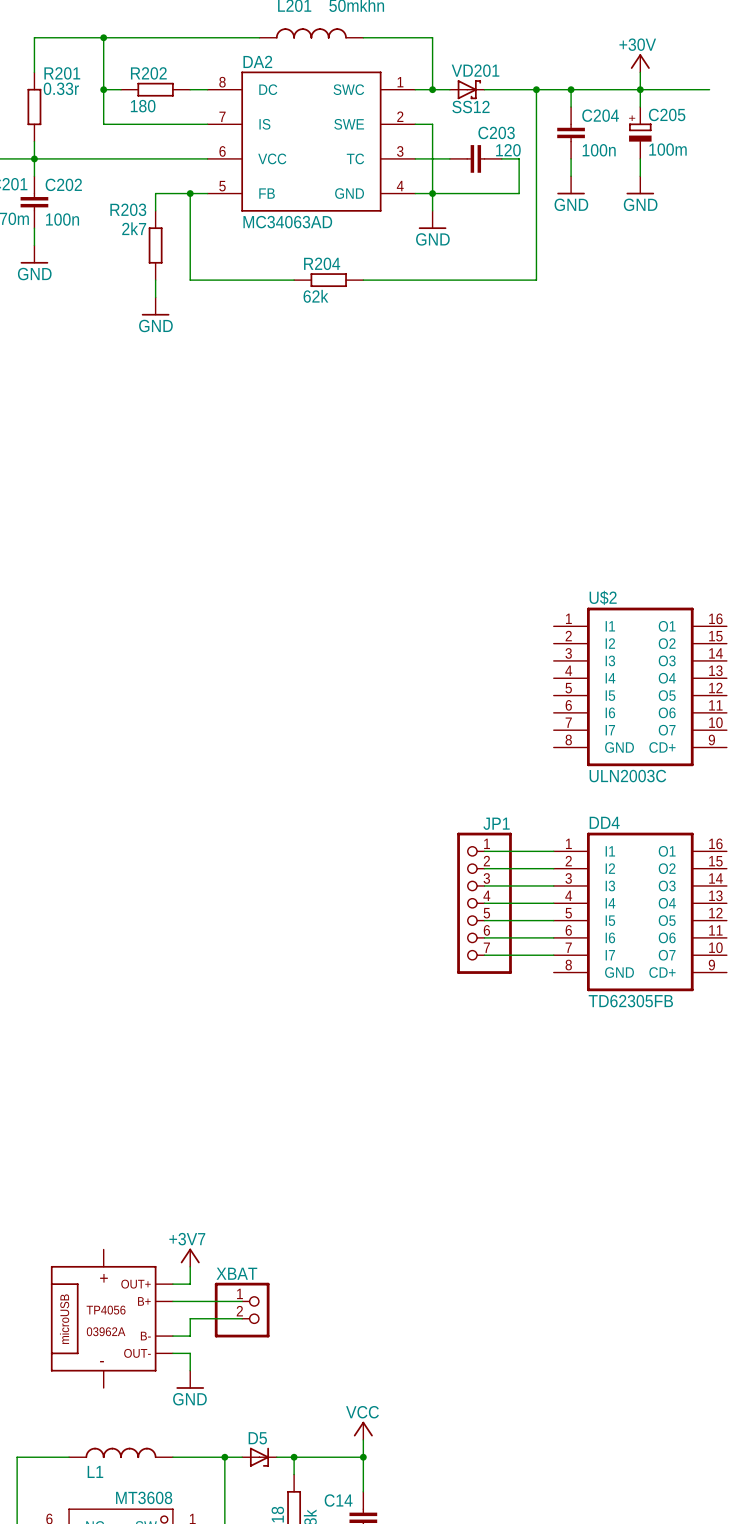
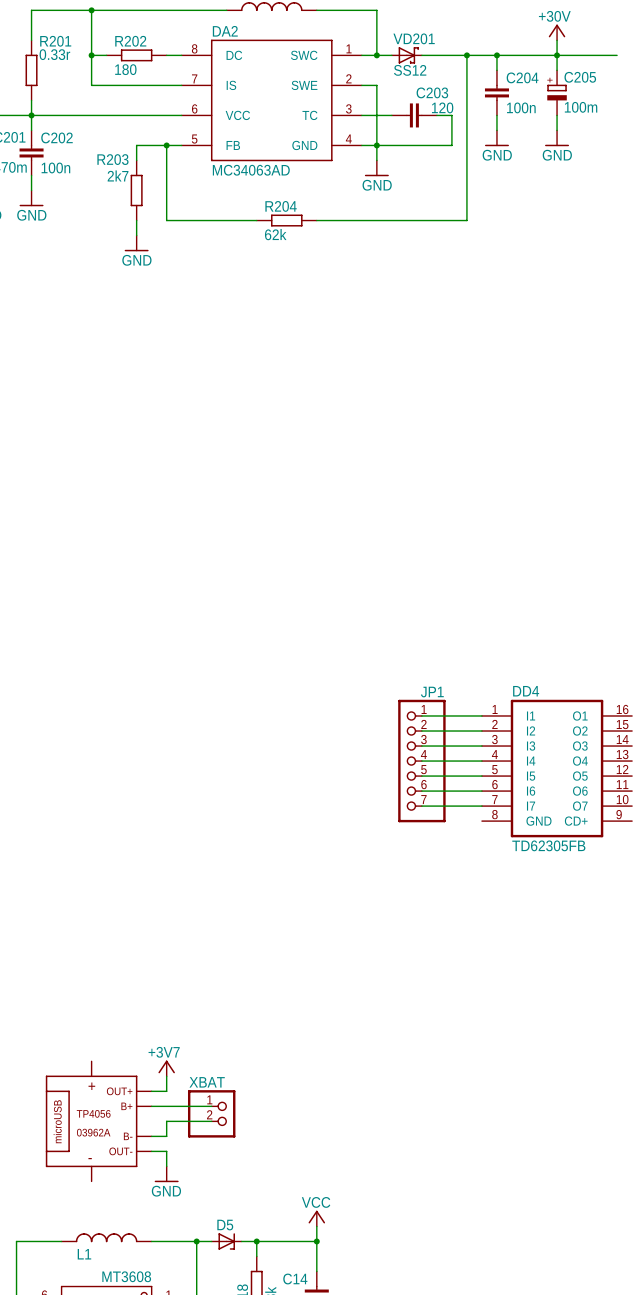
U$2: ULN2003C (640, 686) -> none

